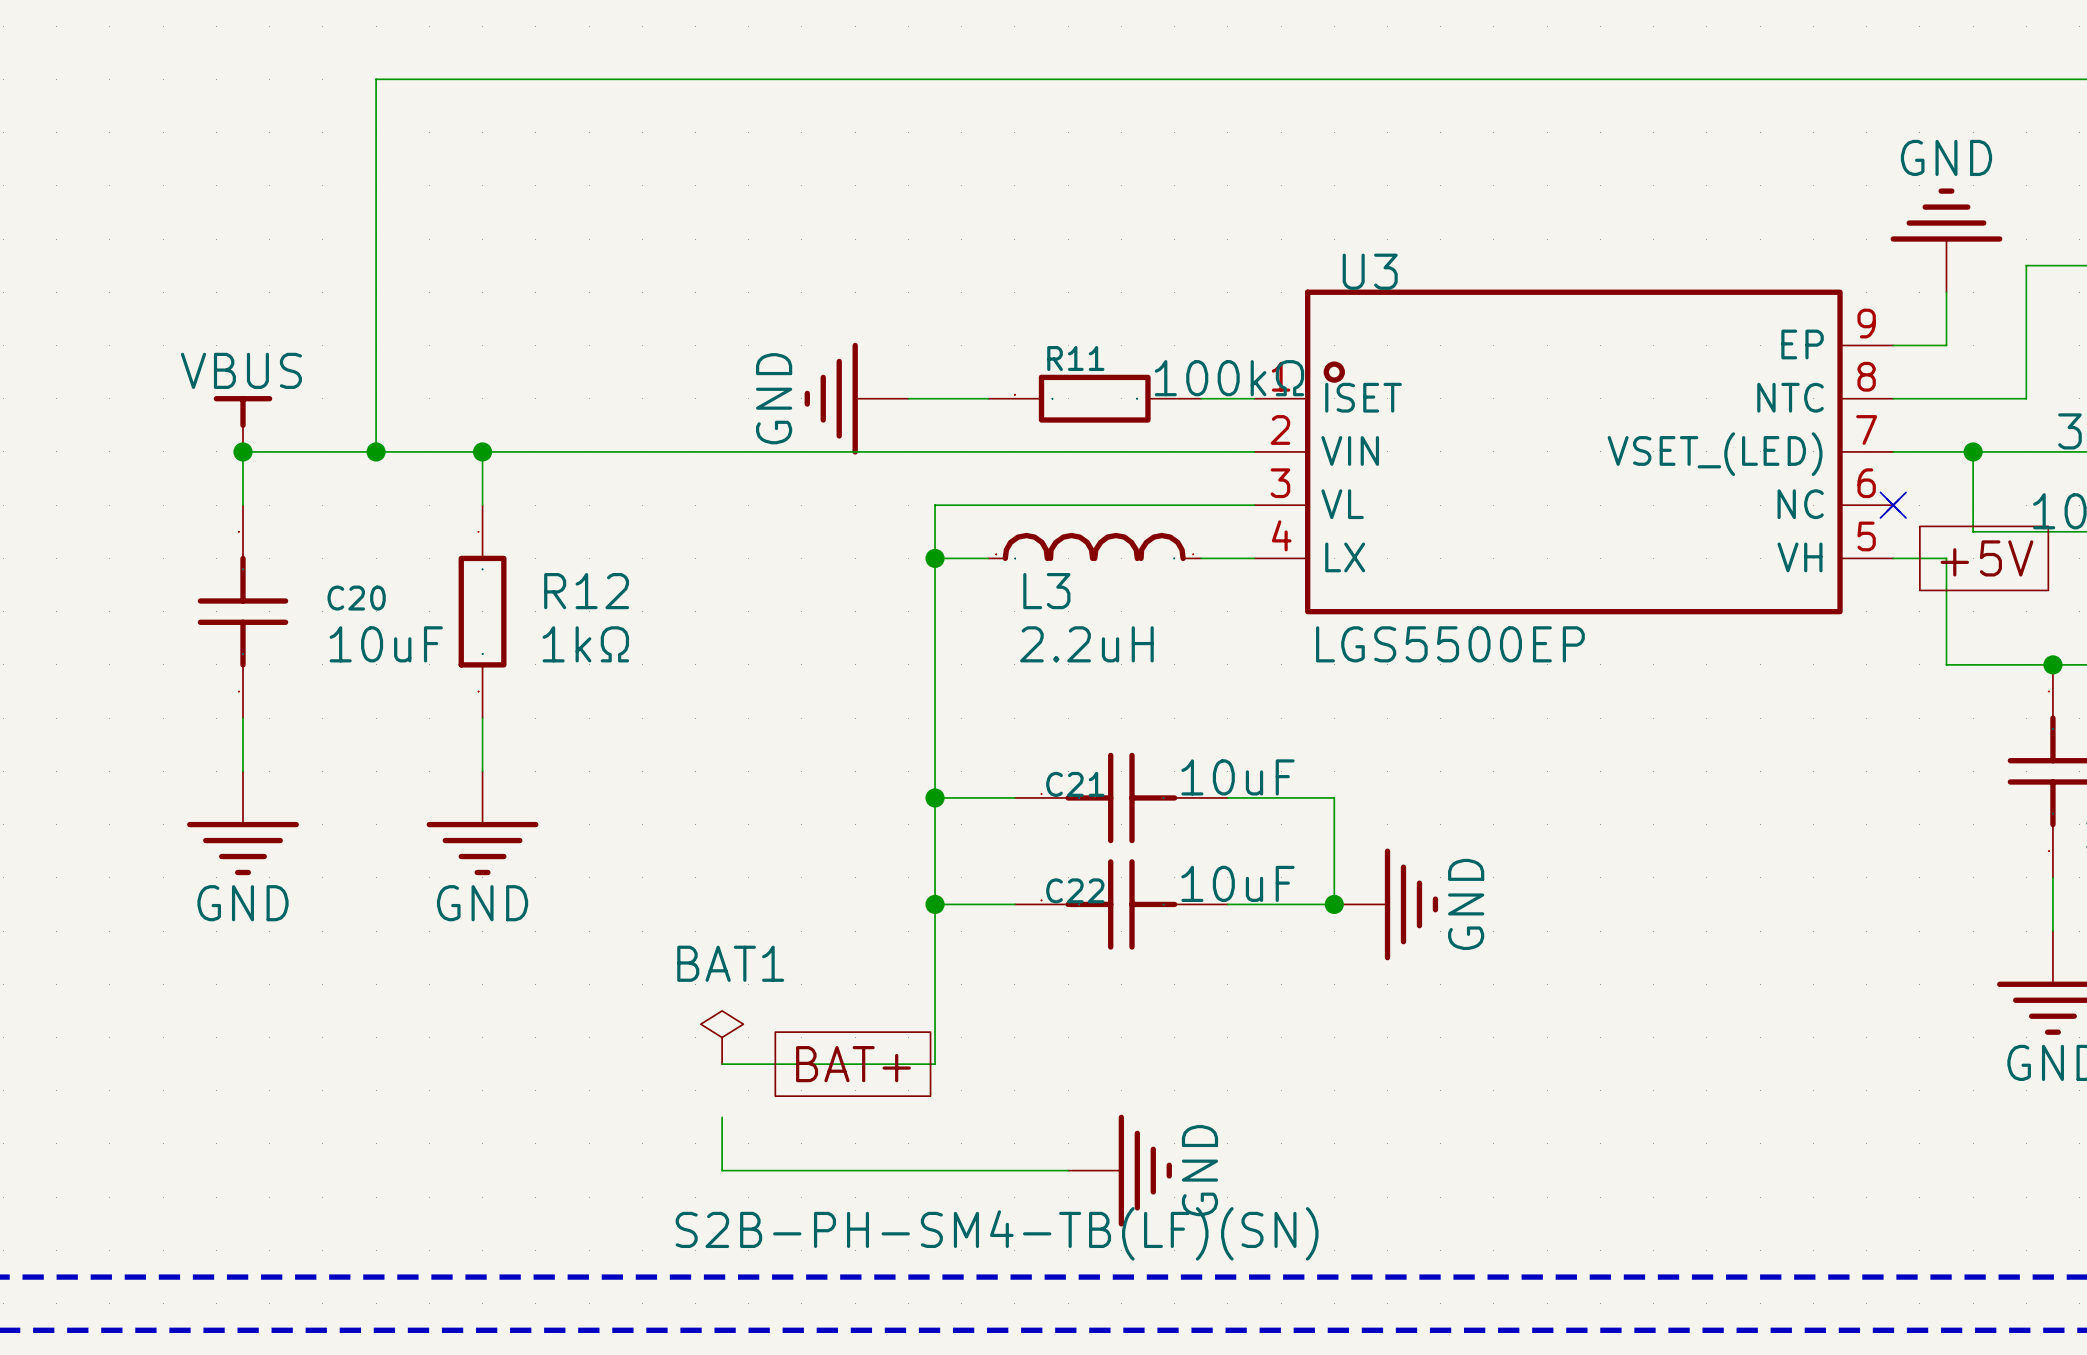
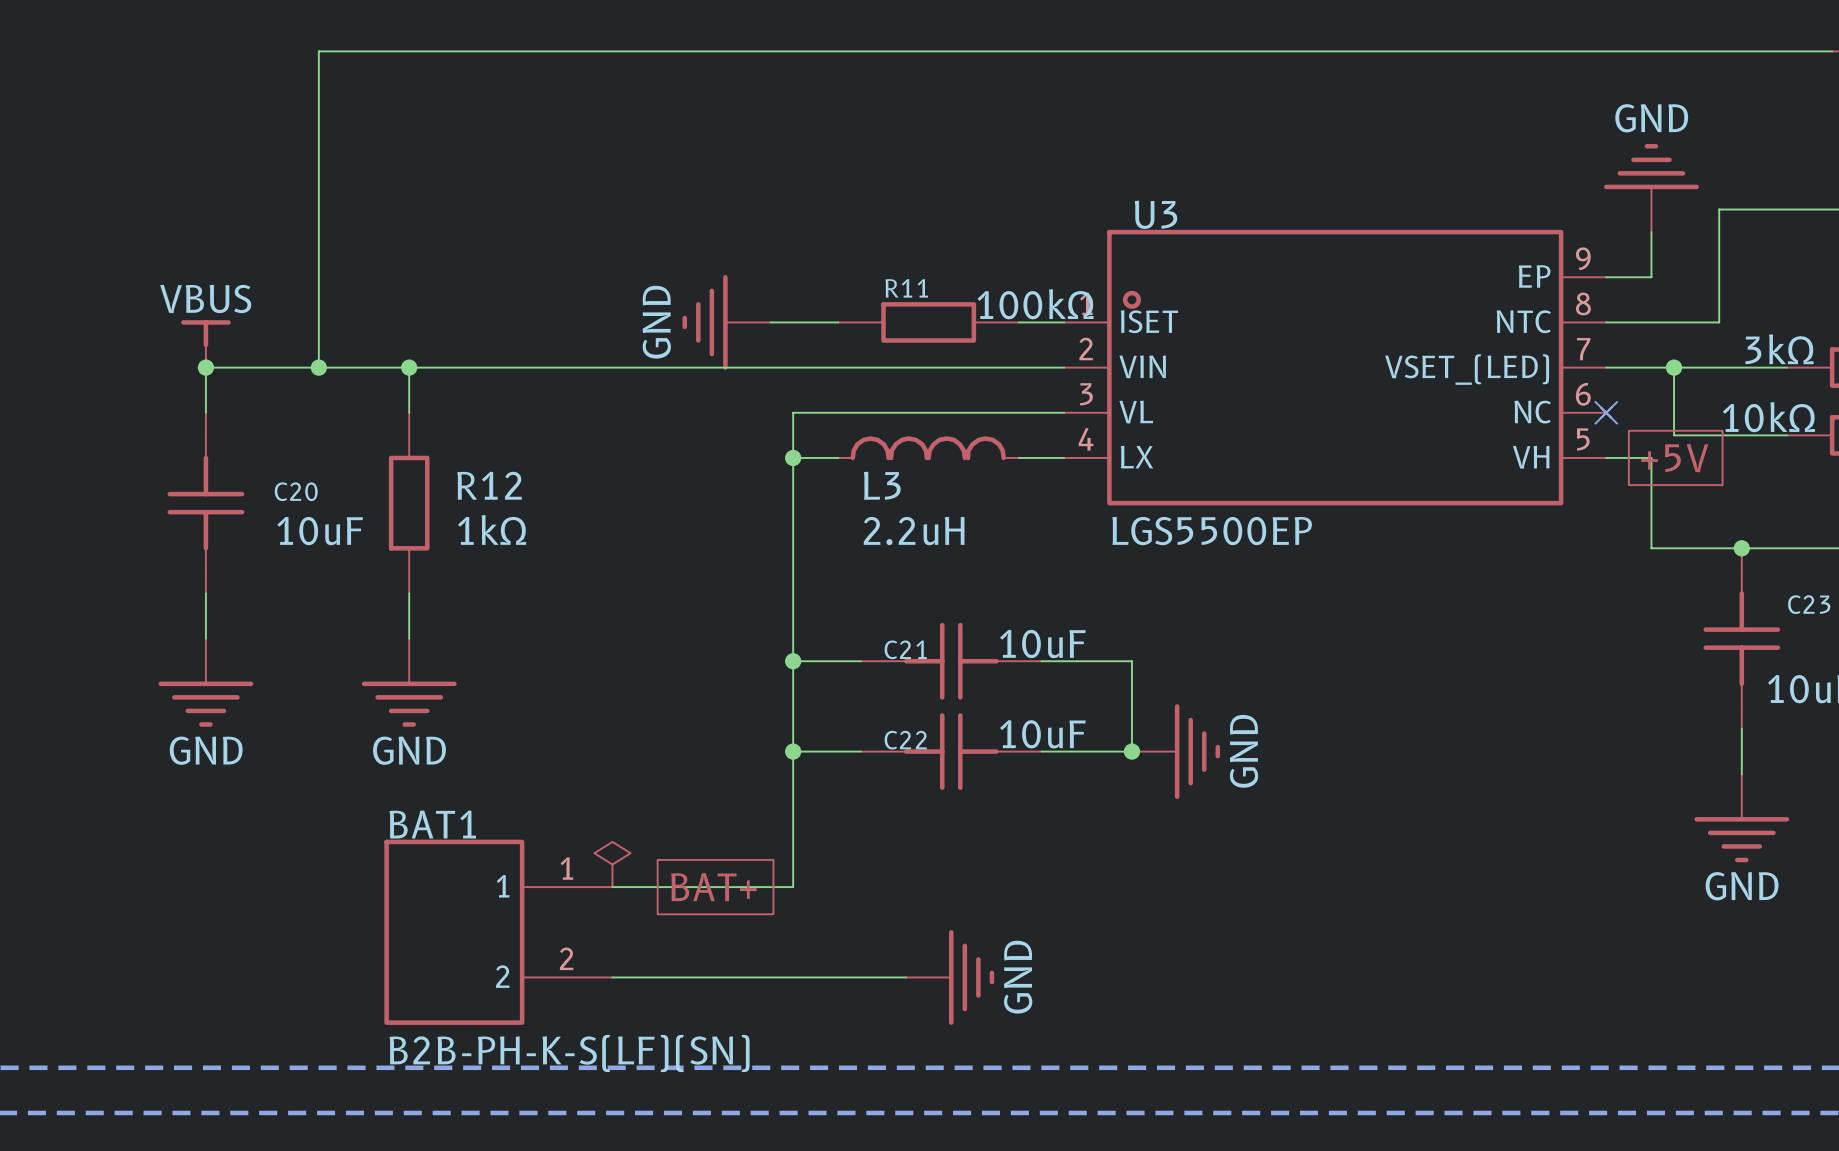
BAT1 symbol: [675, 945, 1319, 1261] -> [384, 839, 613, 1025]
BAT1 name position: BAT1 (730, 963) -> BAT1 (432, 824)
wire: (722, 1117) (722, 1170) -> none
BAT1 value: S2B-PH-SM4-TB(LF)(SN) (997, 1233) -> B2B-PH-K-S(LF)(SN) (569, 1053)

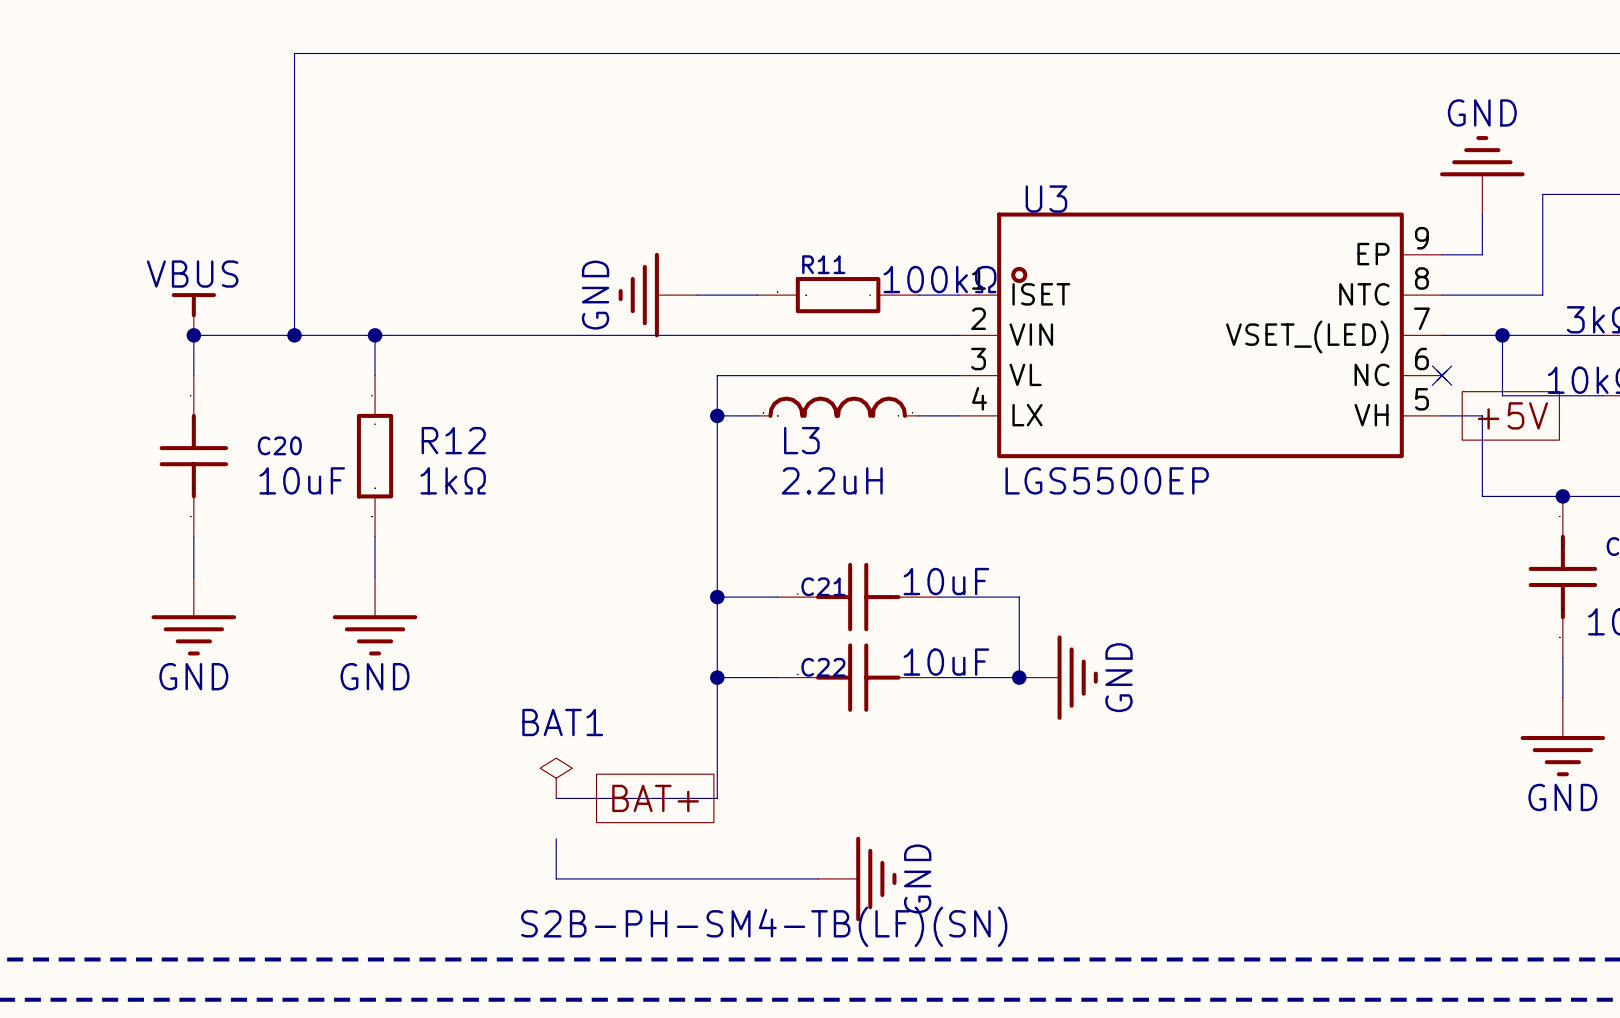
BAT1 name position: BAT1 (432, 824) -> BAT1 (562, 722)
BAT1 symbol: [384, 839, 613, 1025] -> [521, 708, 1008, 948]
wire: none -> (556, 838) (556, 878)
BAT1 value: B2B-PH-K-S(LF)(SN) (569, 1053) -> S2B-PH-SM4-TB(LF)(SN) (764, 926)

